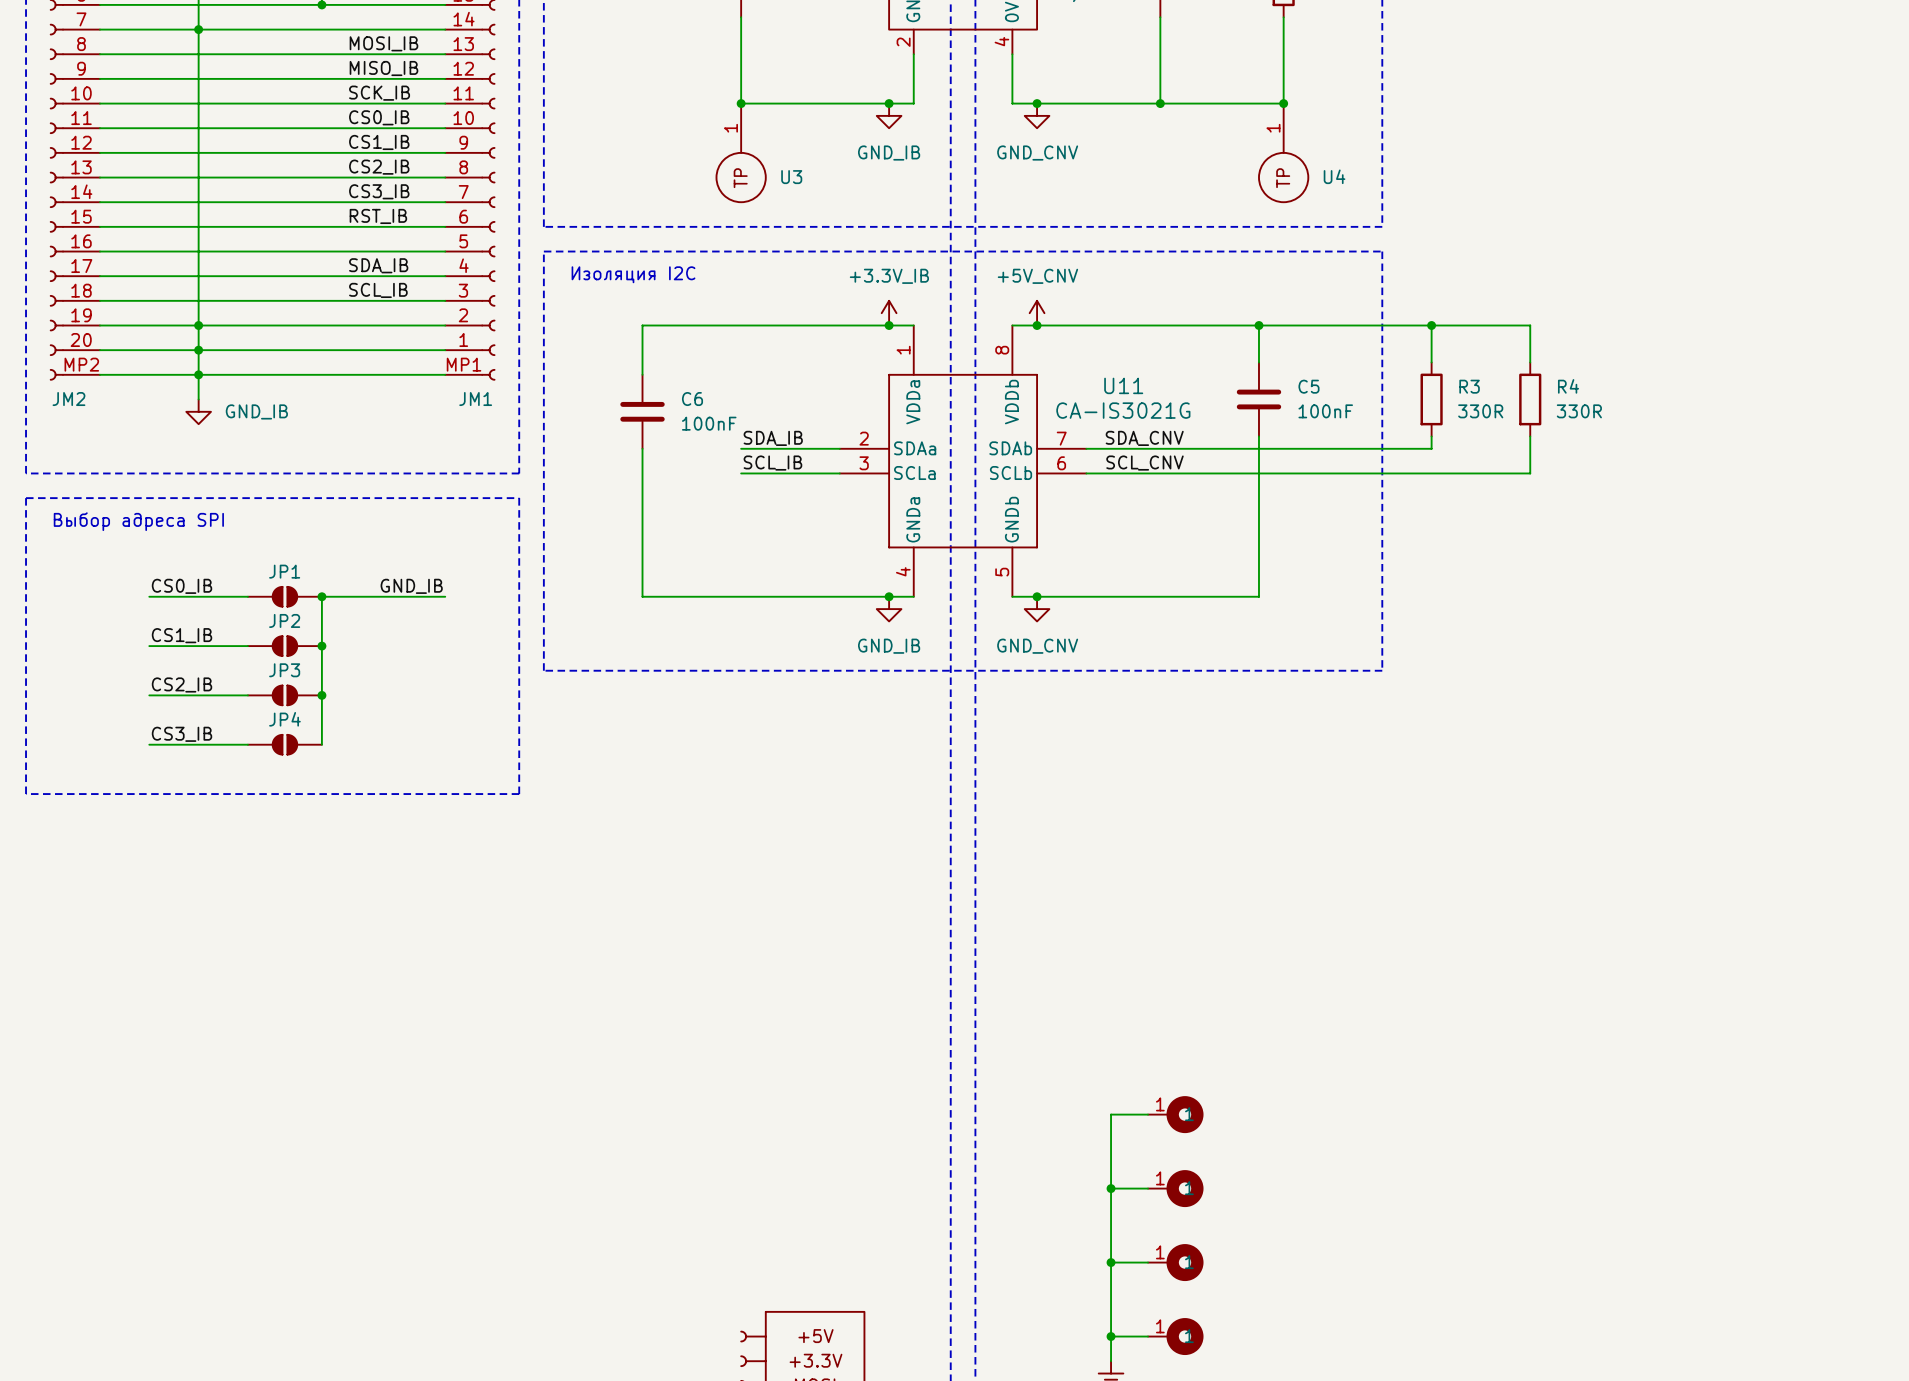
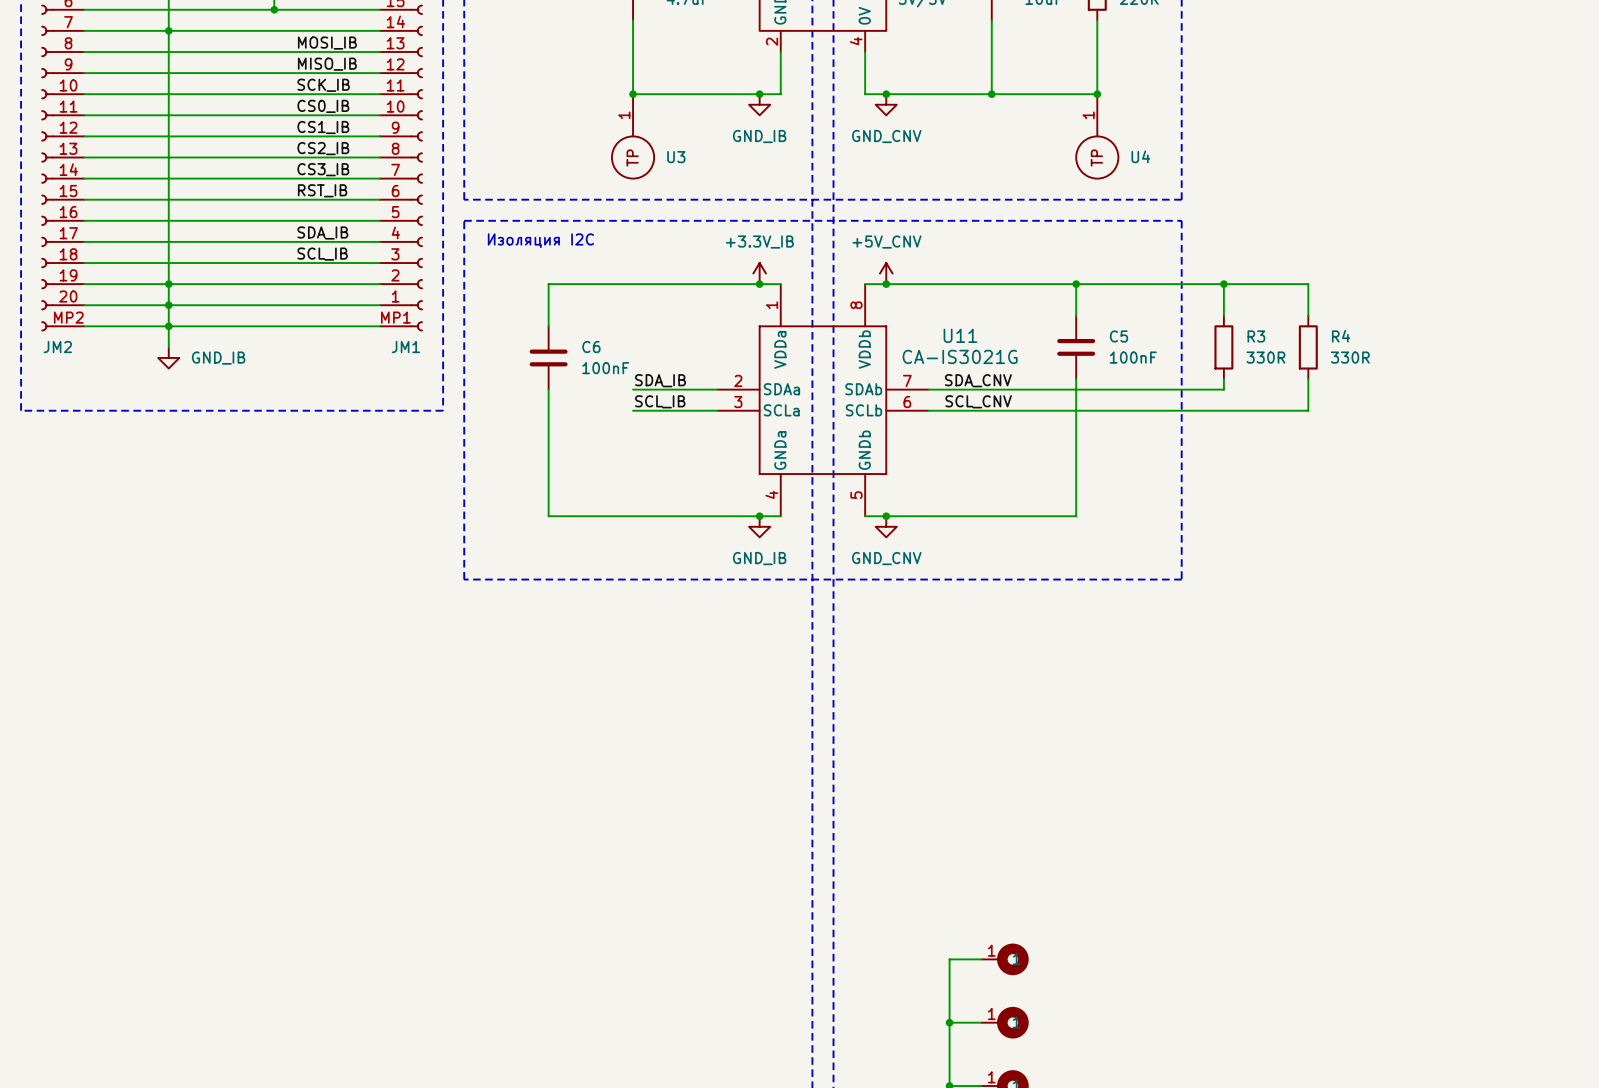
line: (26, 498) (519, 498) (519, 794) (26, 794) (26, 498) -> none
text: Выбор адреса SPI (138, 521) -> none
label: CS0_IB (182, 586) -> none
label: GND_IB (411, 586) -> none
wire: (149, 596) (247, 596) -> none
JP1: (284, 596) -> none
junction: (321, 596) -> none
wire: (445, 596) (321, 596) (321, 744) -> none
label: CS1_IB (182, 635) -> none
wire: (149, 646) (247, 646) -> none
JP2: (284, 646) -> none
junction: (321, 646) -> none
label: CS2_IB (182, 684) -> none
wire: (149, 695) (247, 695) -> none
JP3: (284, 695) -> none
junction: (321, 695) -> none
label: CS3_IB (182, 734) -> none
wire: (149, 744) (247, 744) -> none
JP4: (284, 744) -> none

